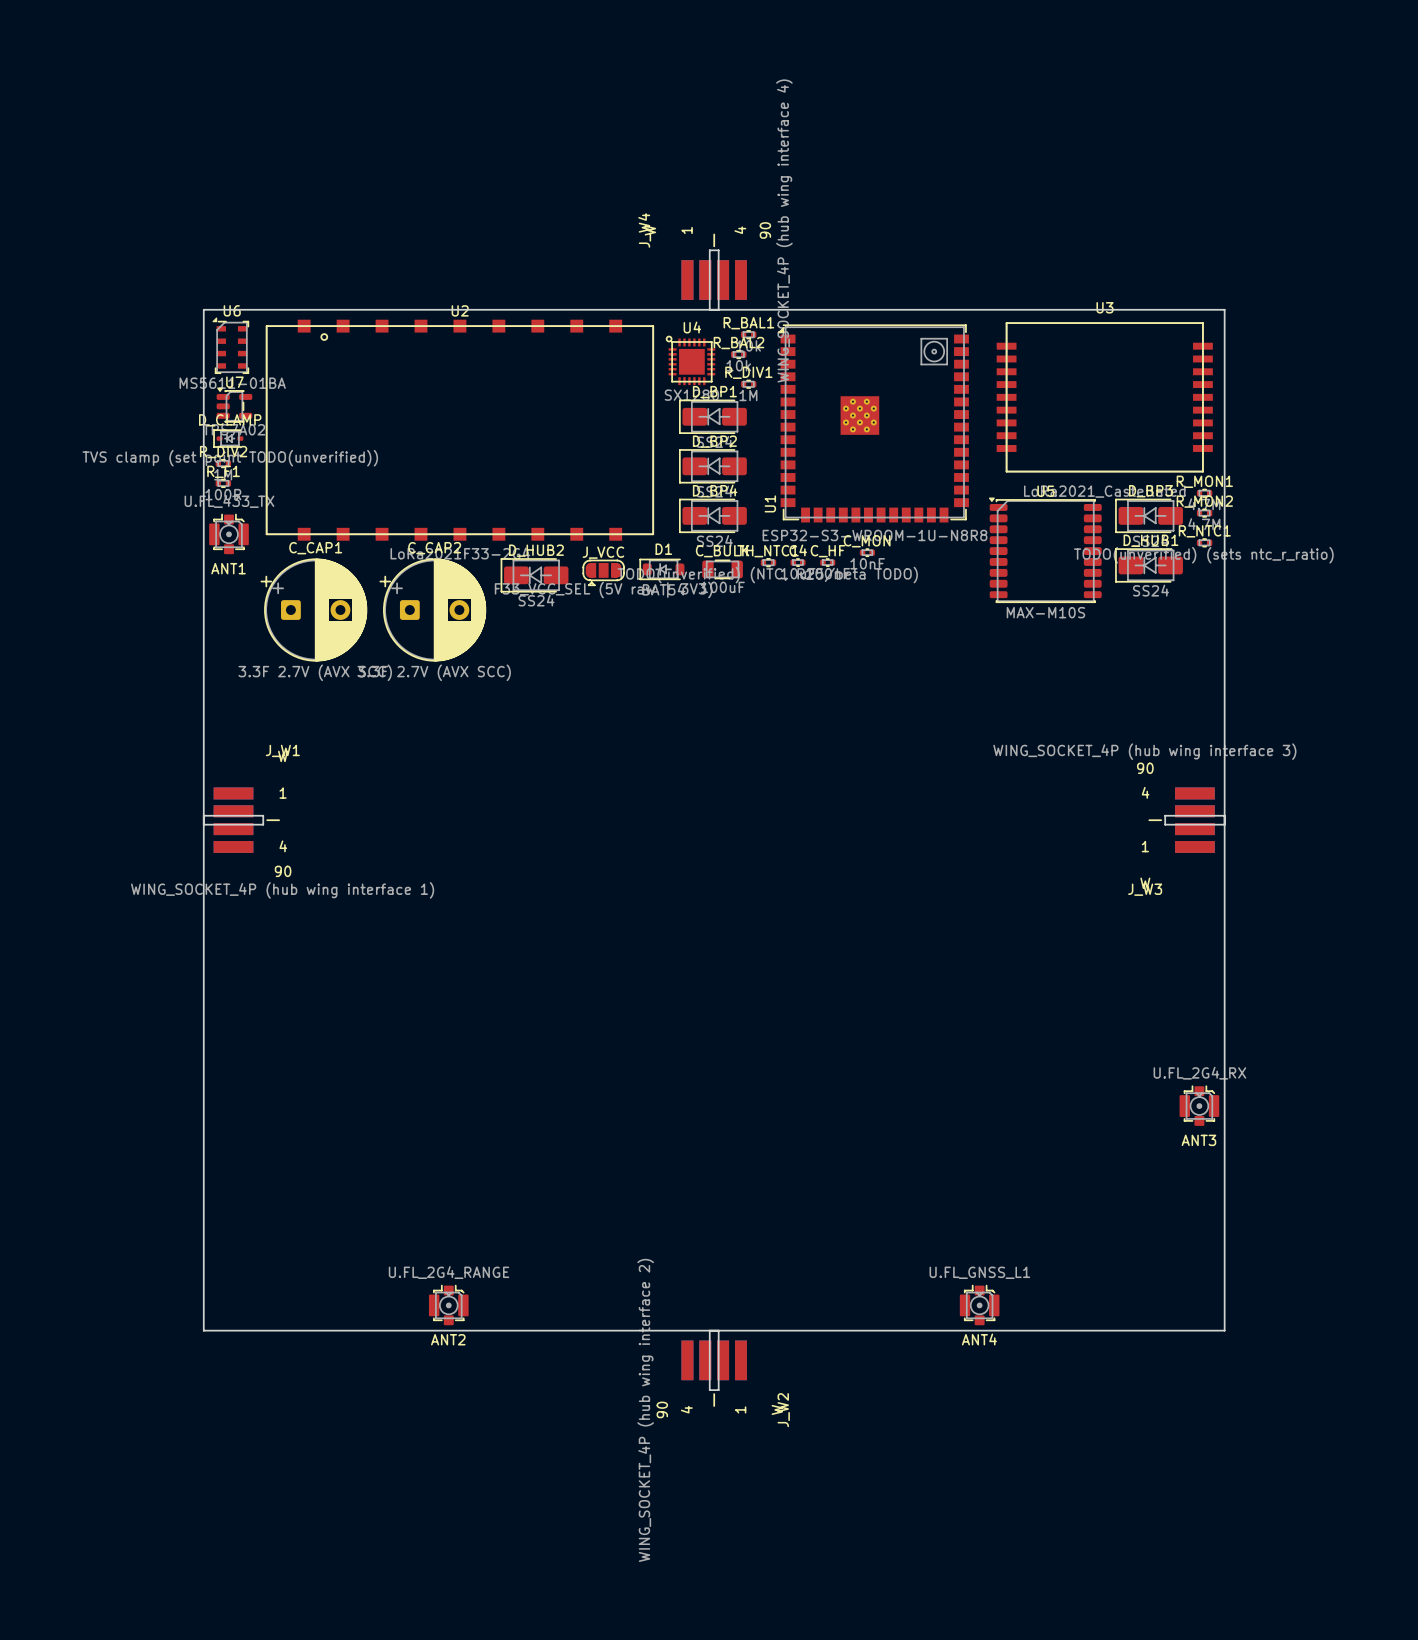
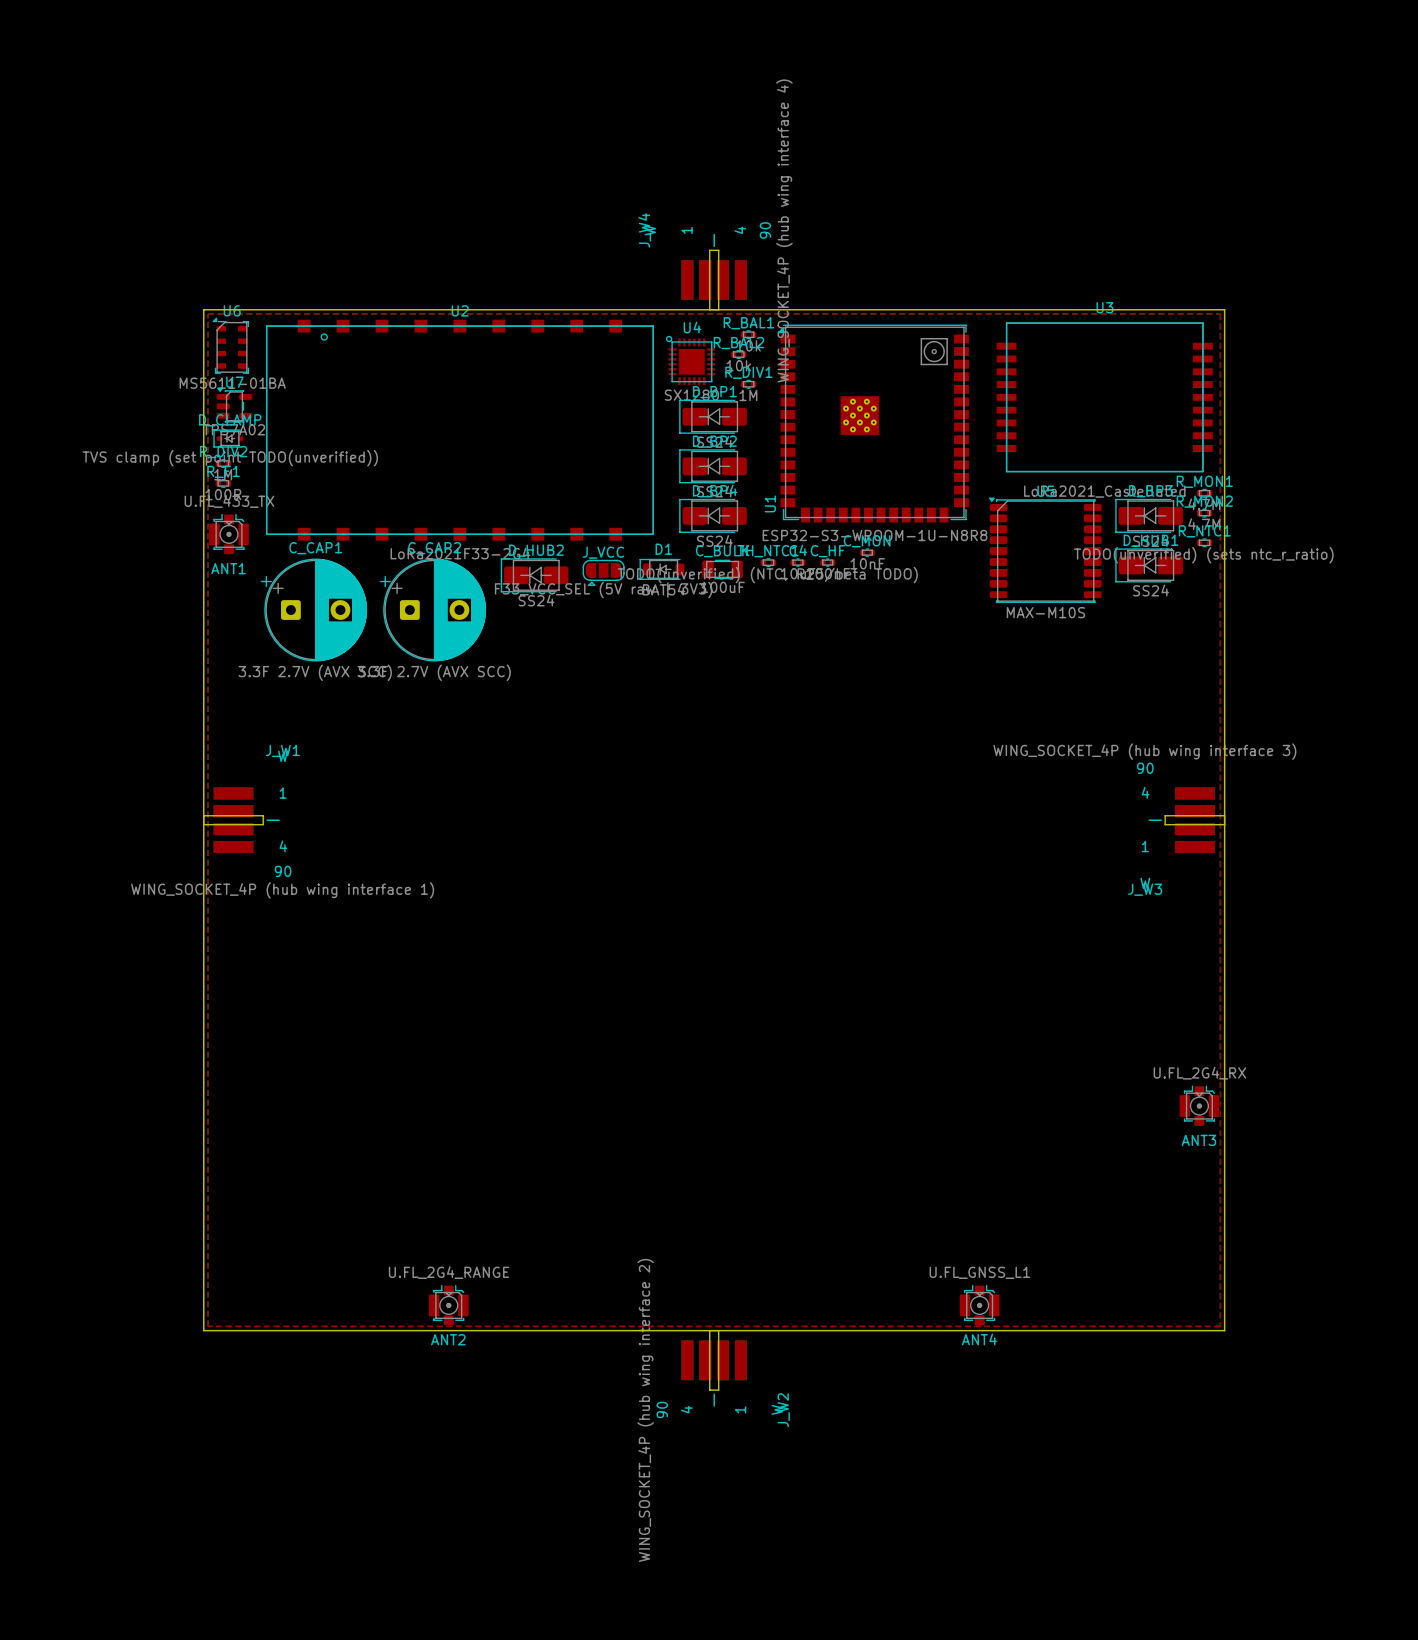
top zone outline: none -> (207, 313) (1220, 313) (1220, 1326) (207, 1326) (207, 313)

